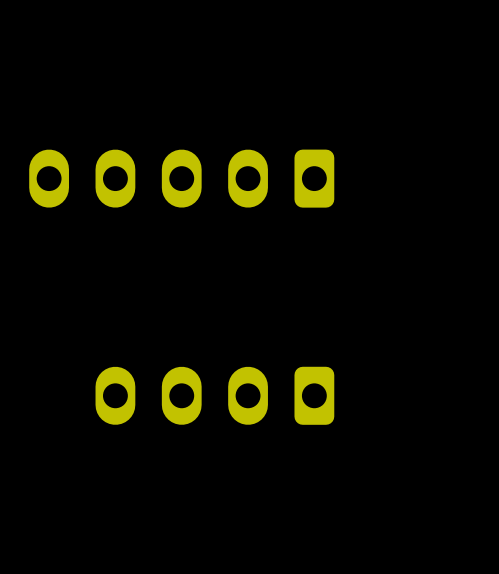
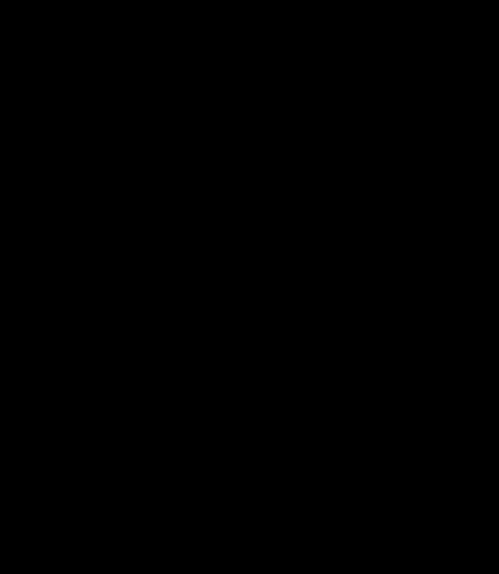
part: (181, 178) -> none
part: (214, 395) -> none

